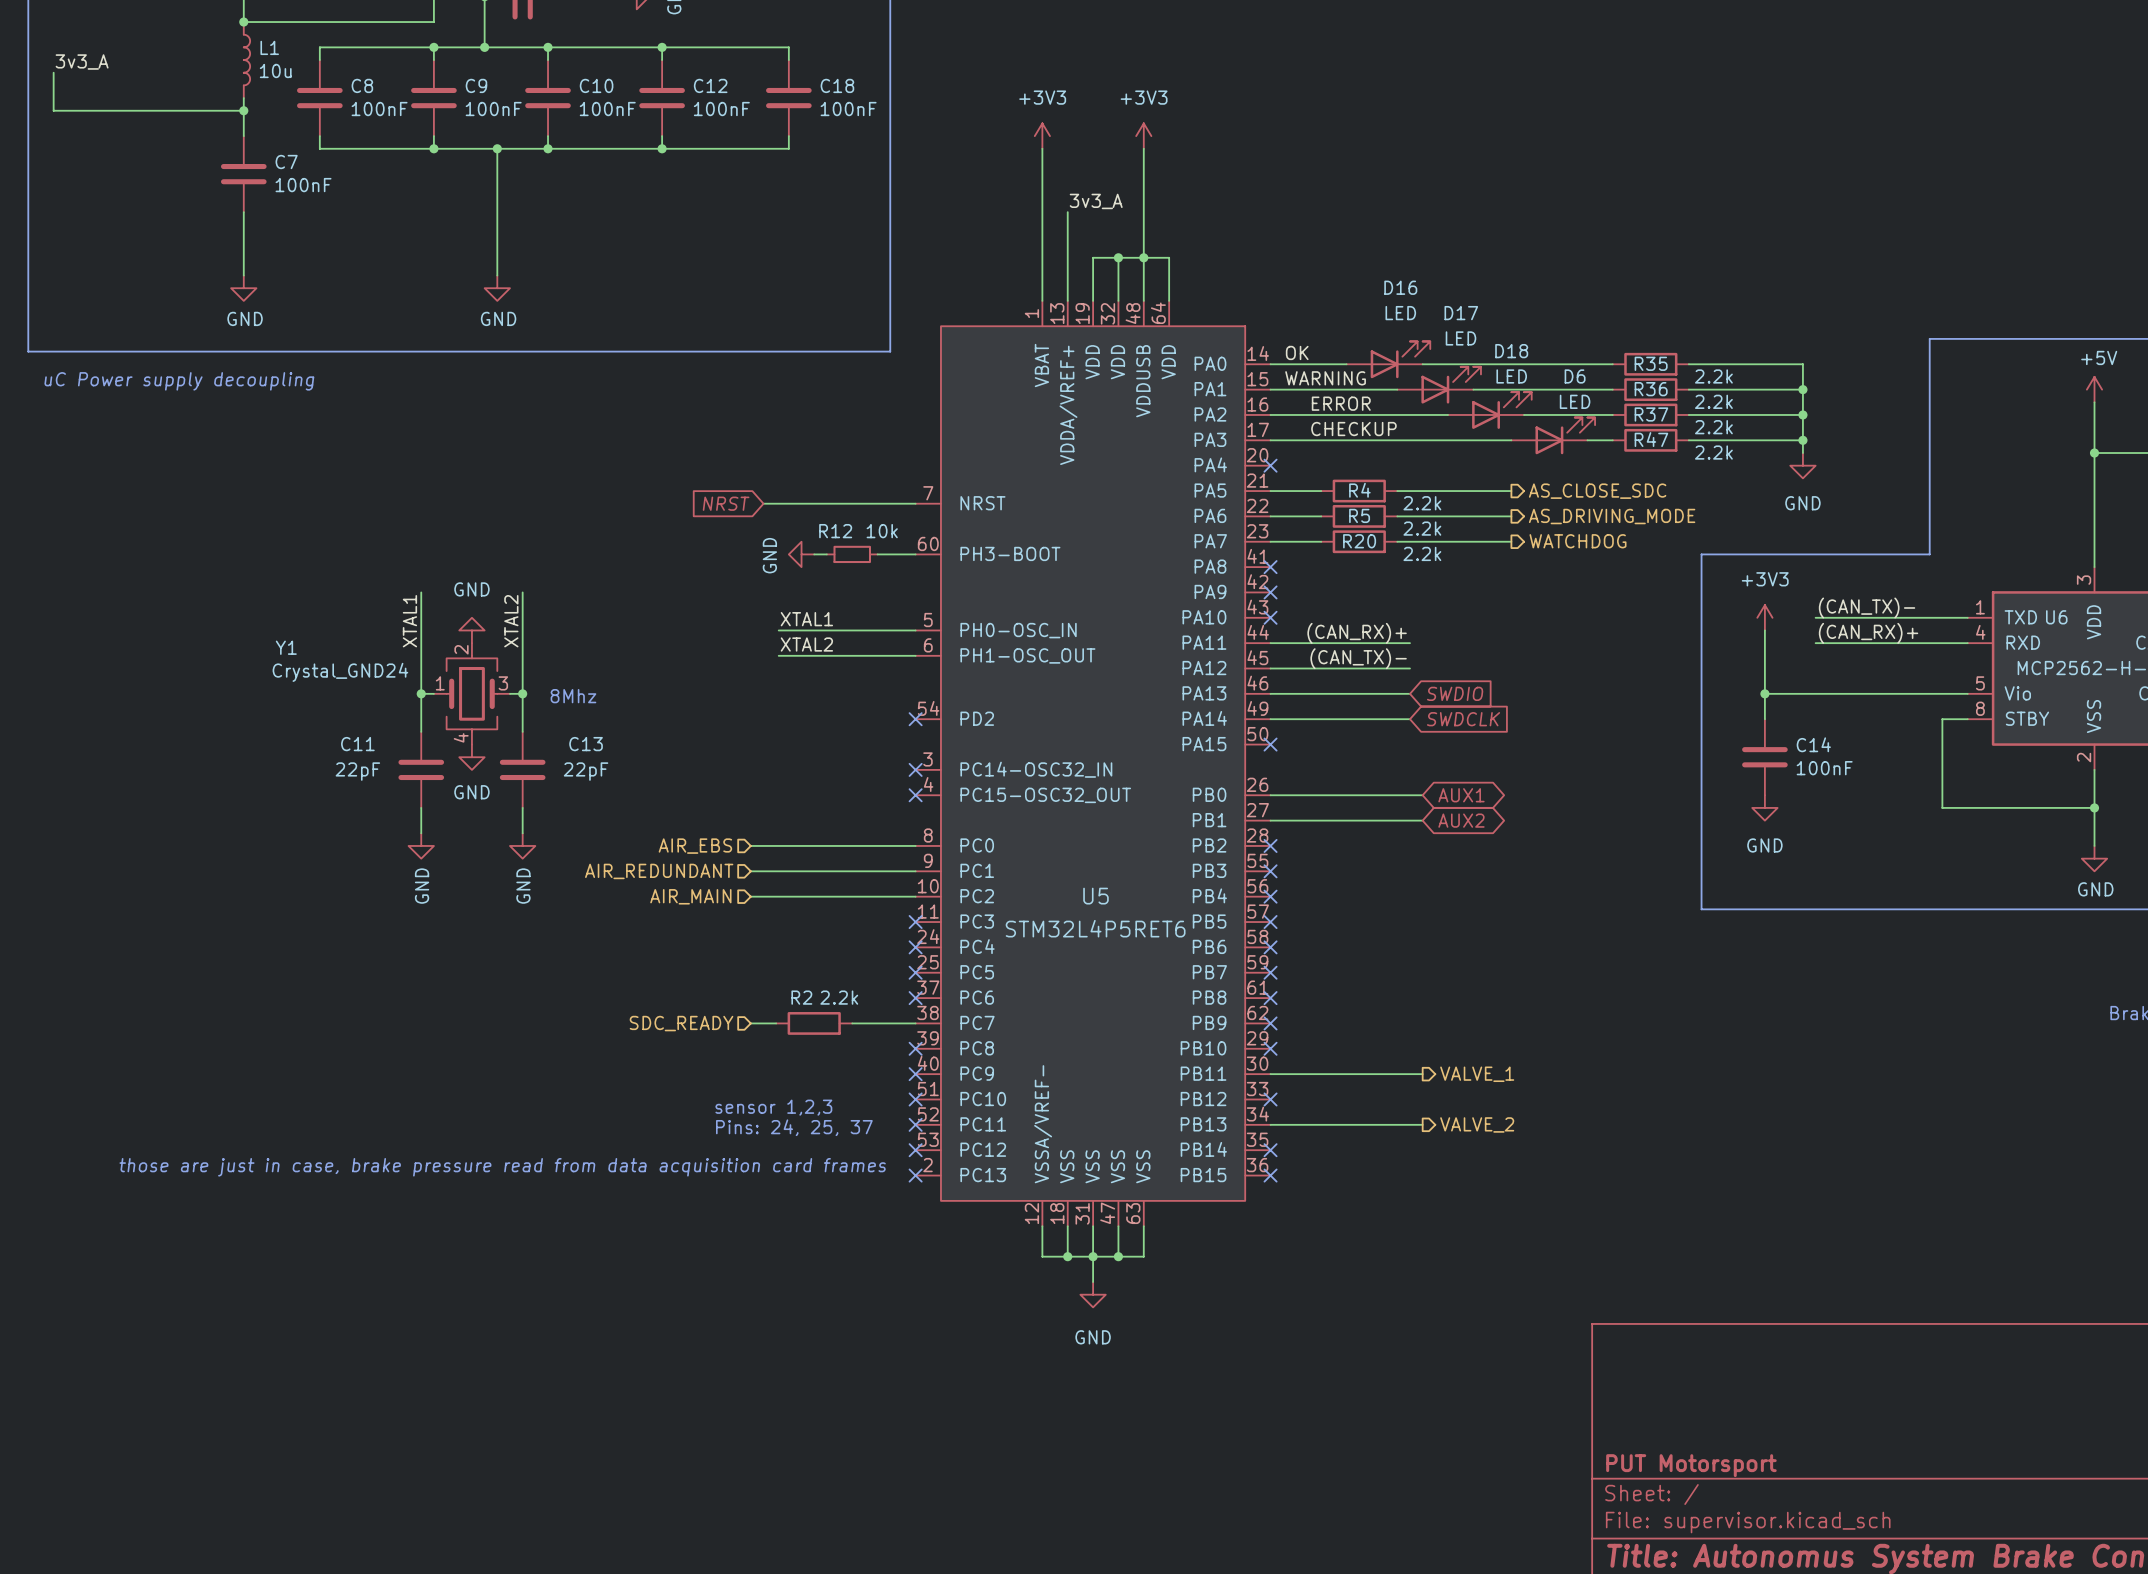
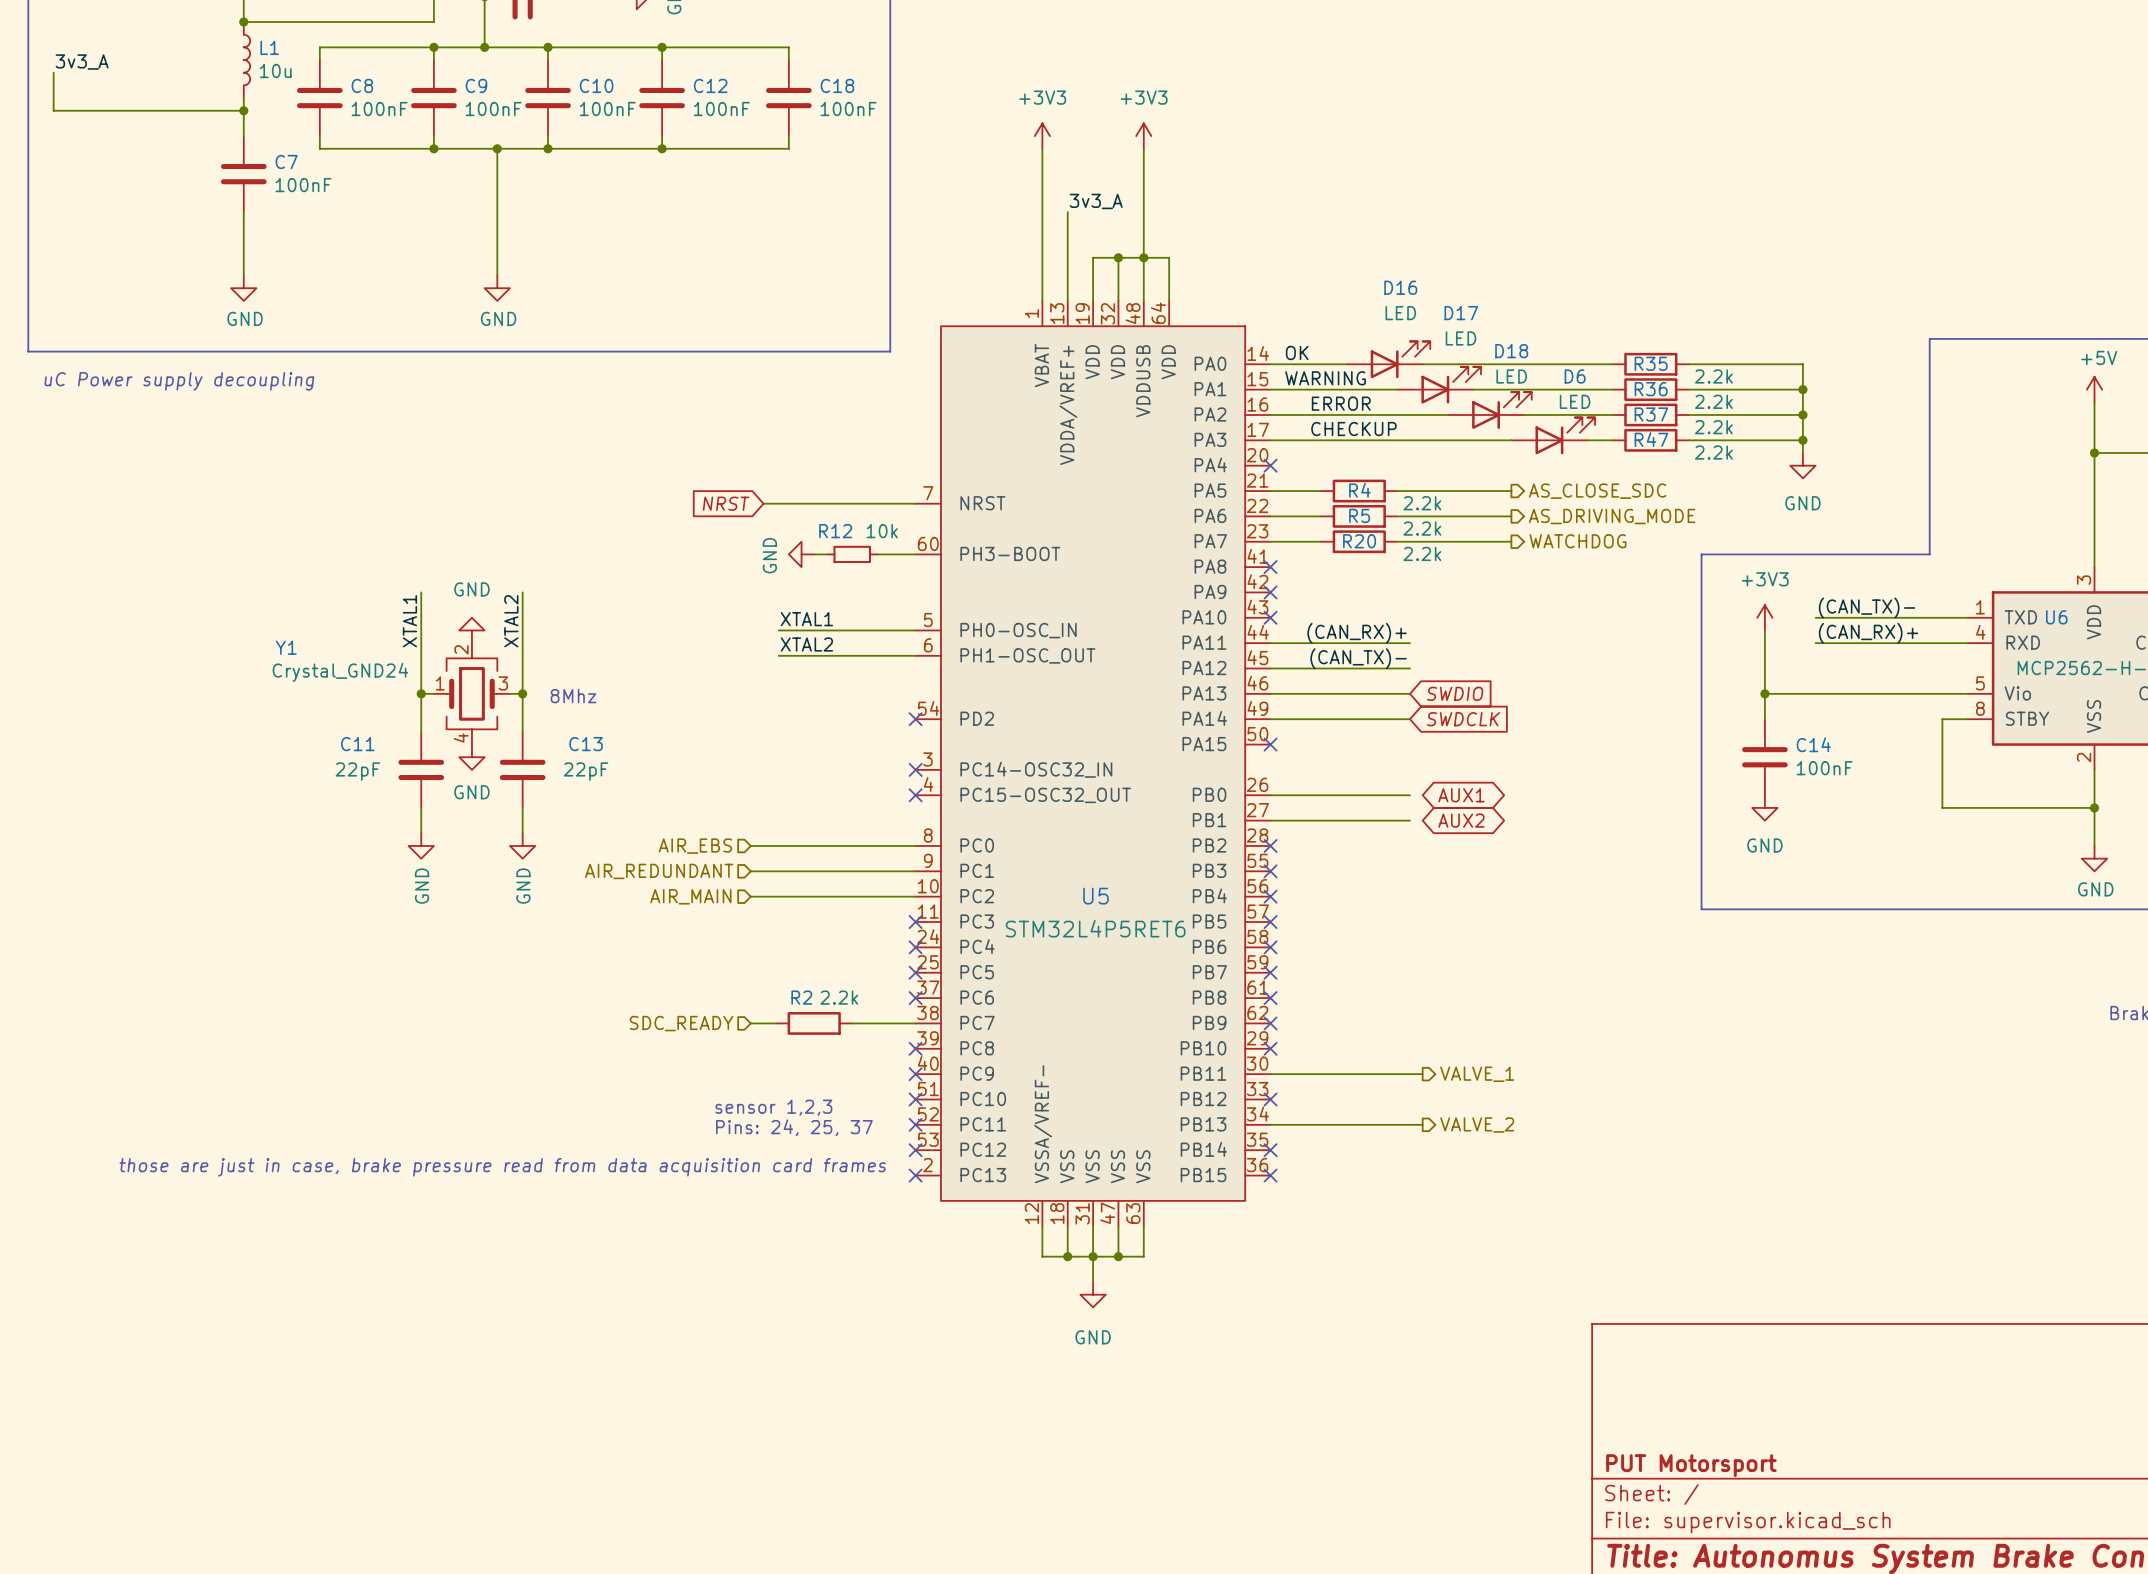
wire: (1409, 795) (1422, 795) -> none
wire: (1409, 820) (1422, 820) -> none

